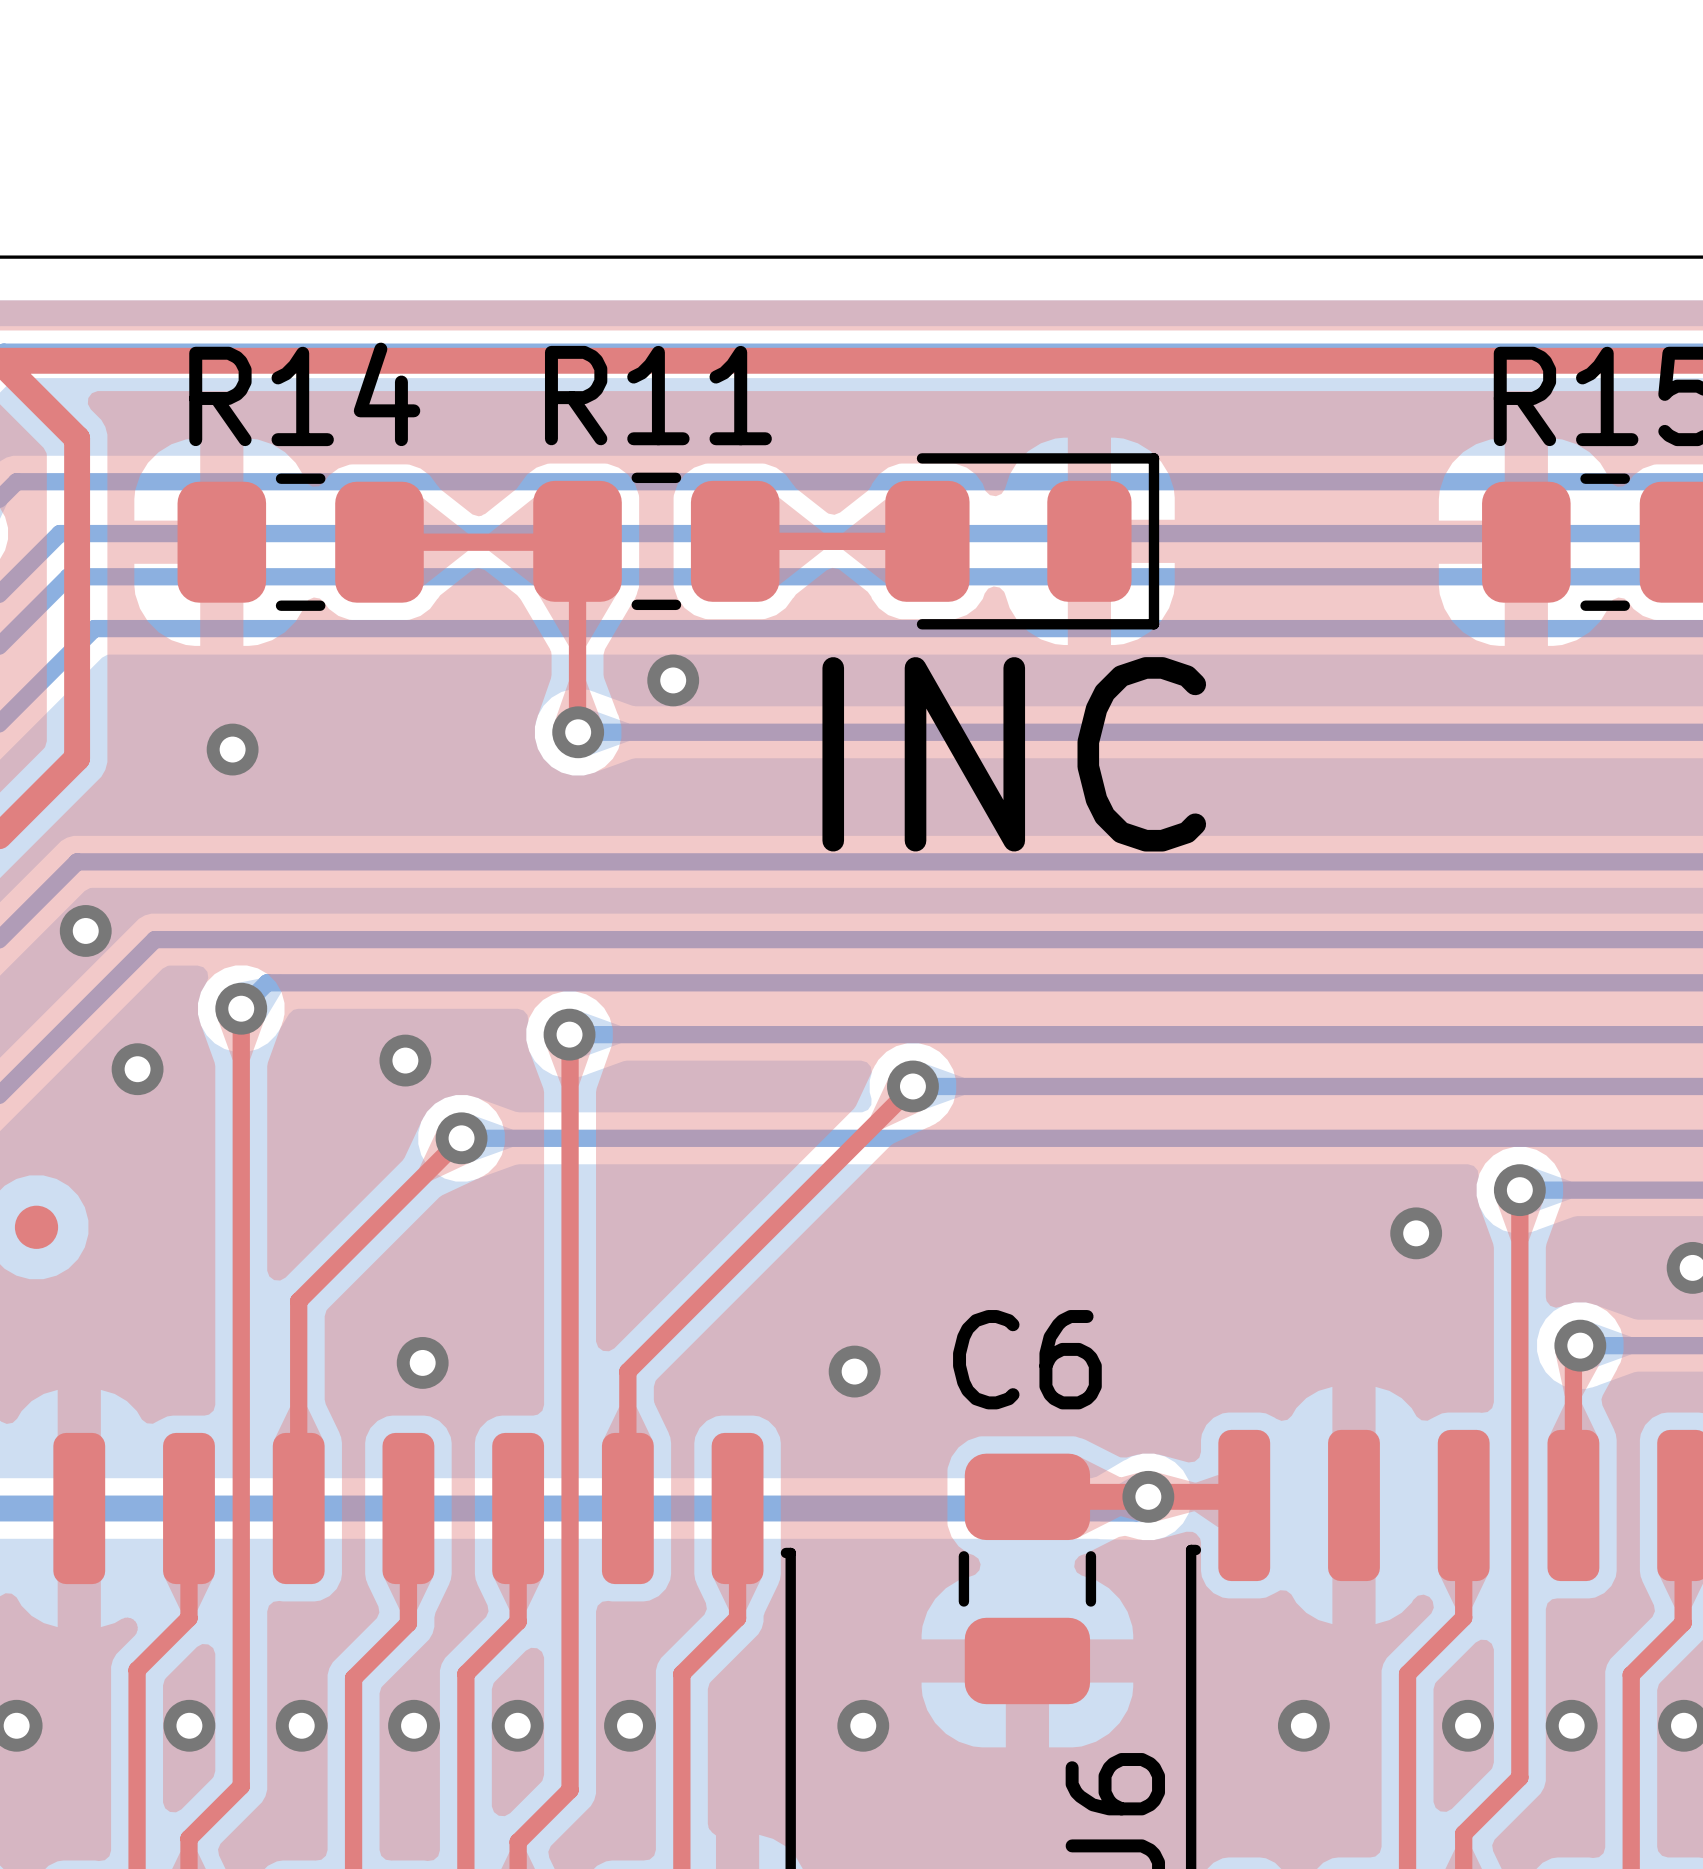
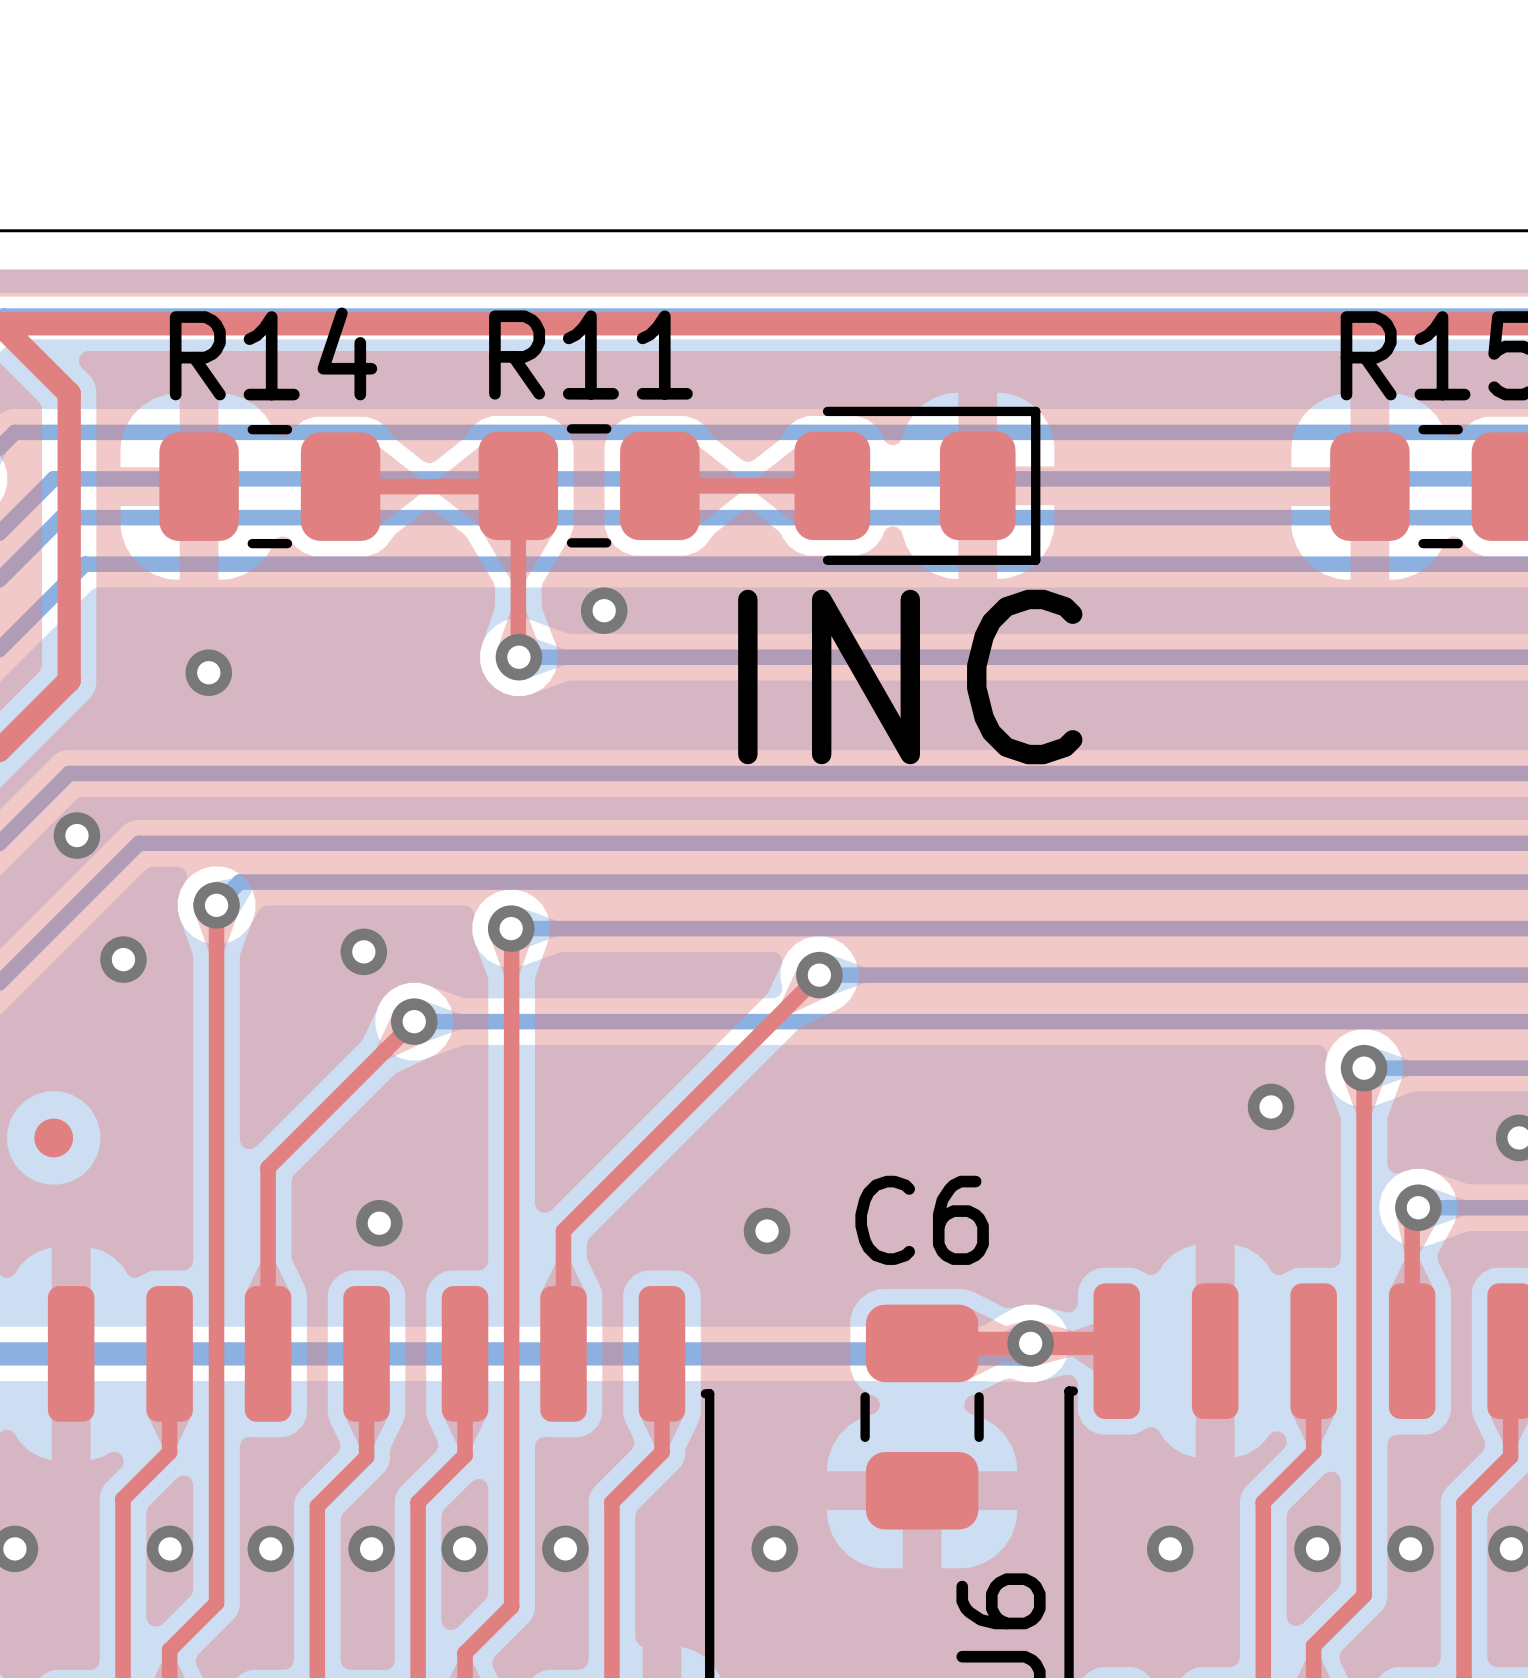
part position: (36, 1227) -> (53, 1137)

